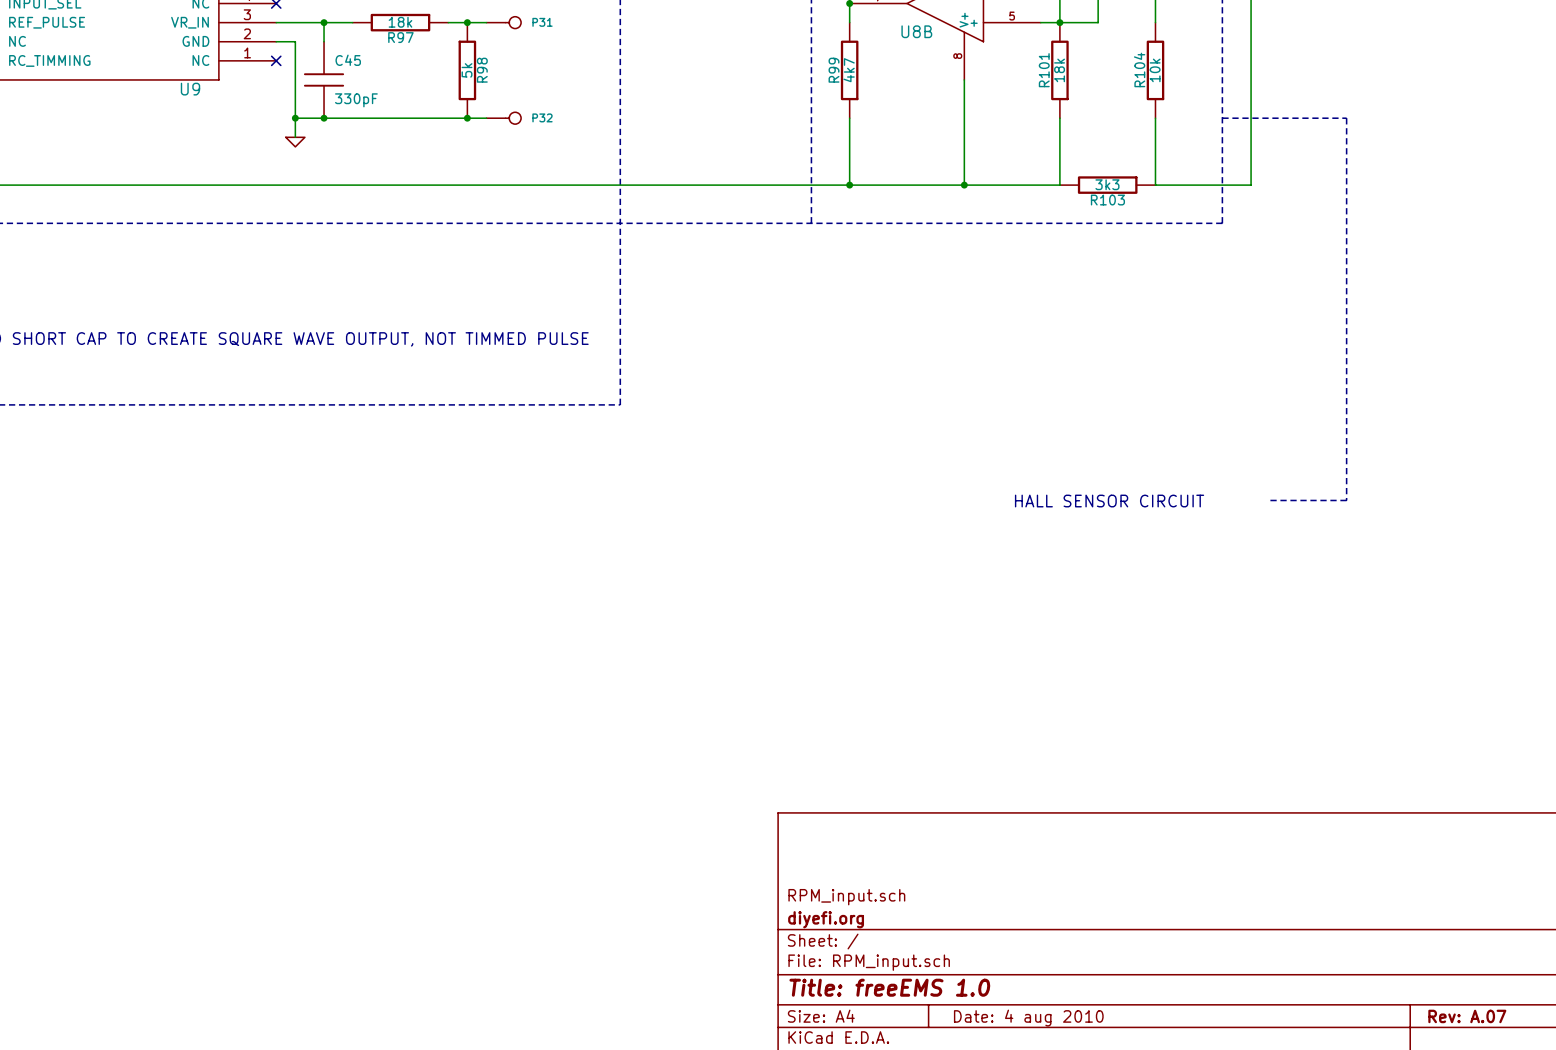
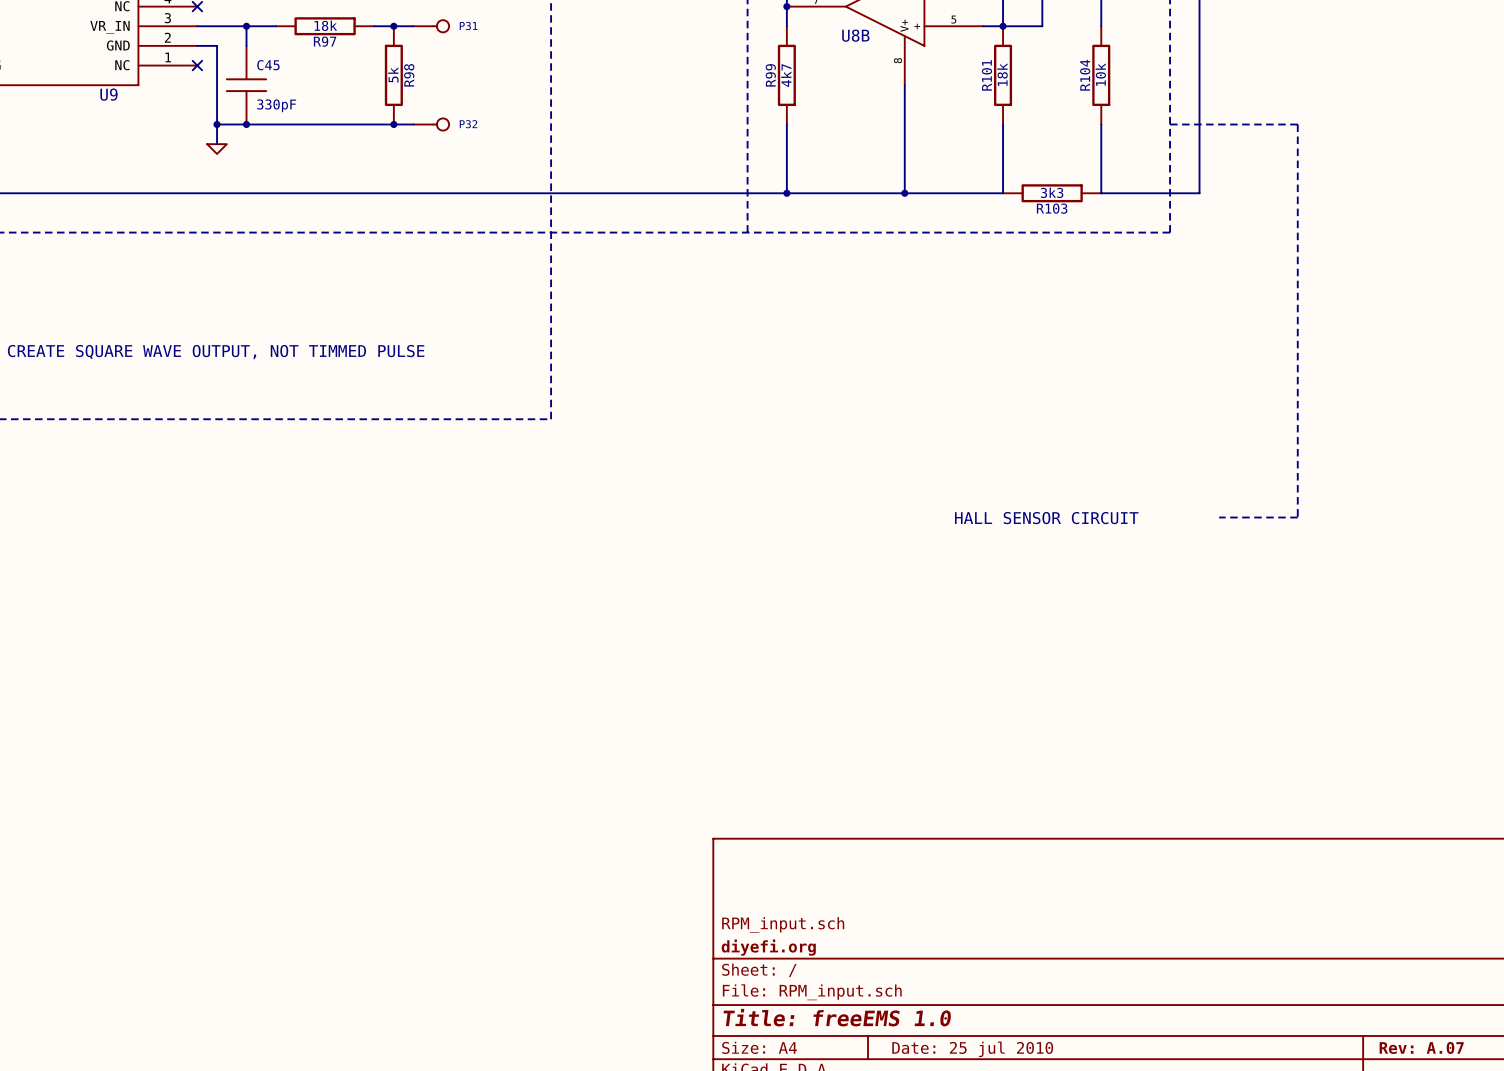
title block: Date: 4 aug 2010 (1028, 1018) -> Date: 25 jul 2010 (972, 1049)

